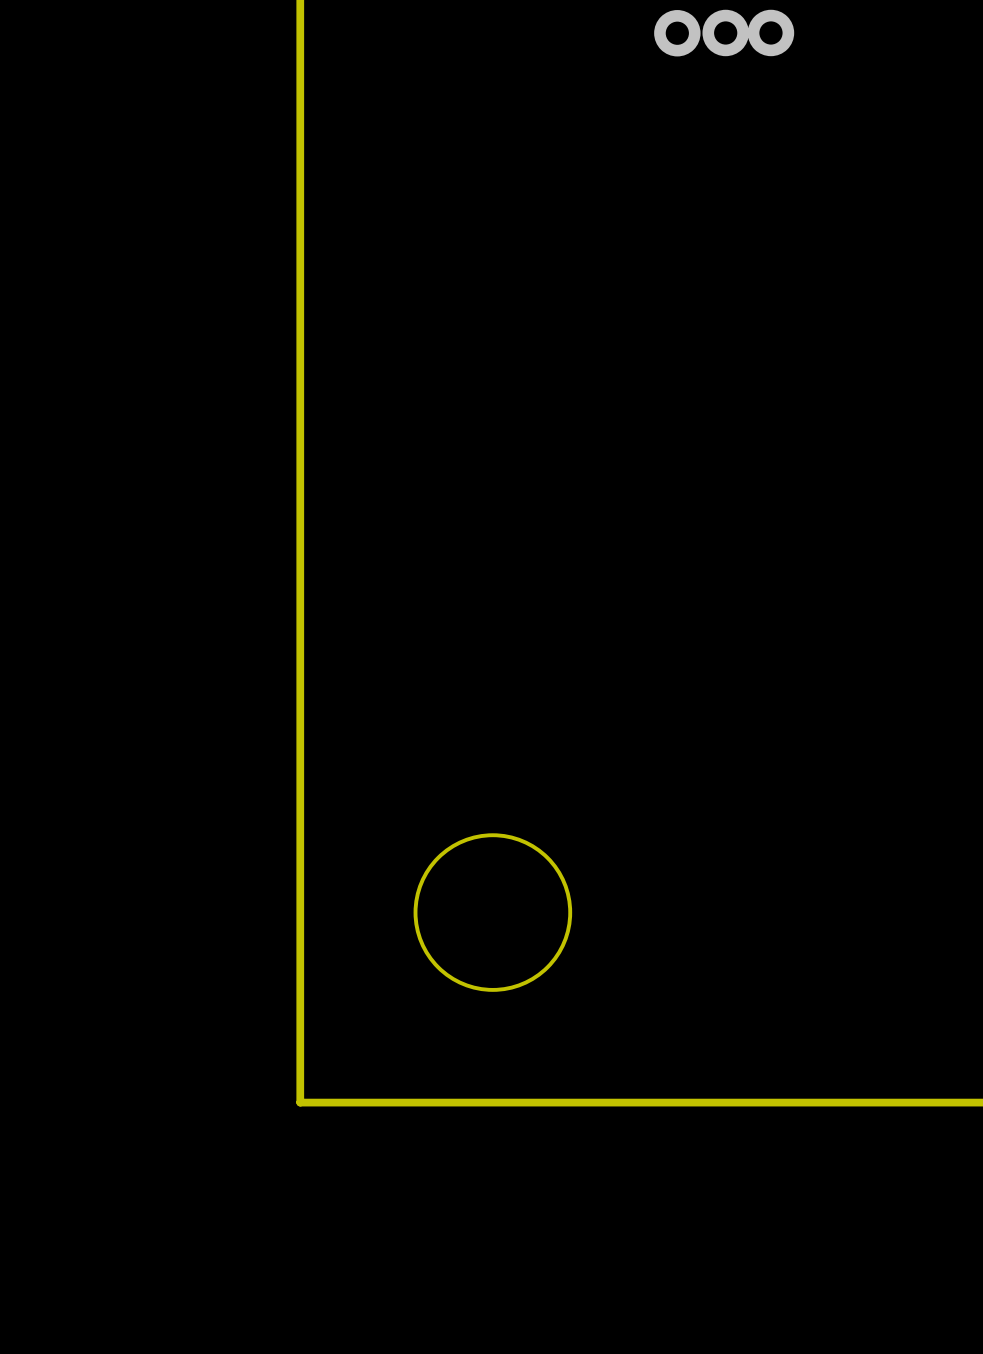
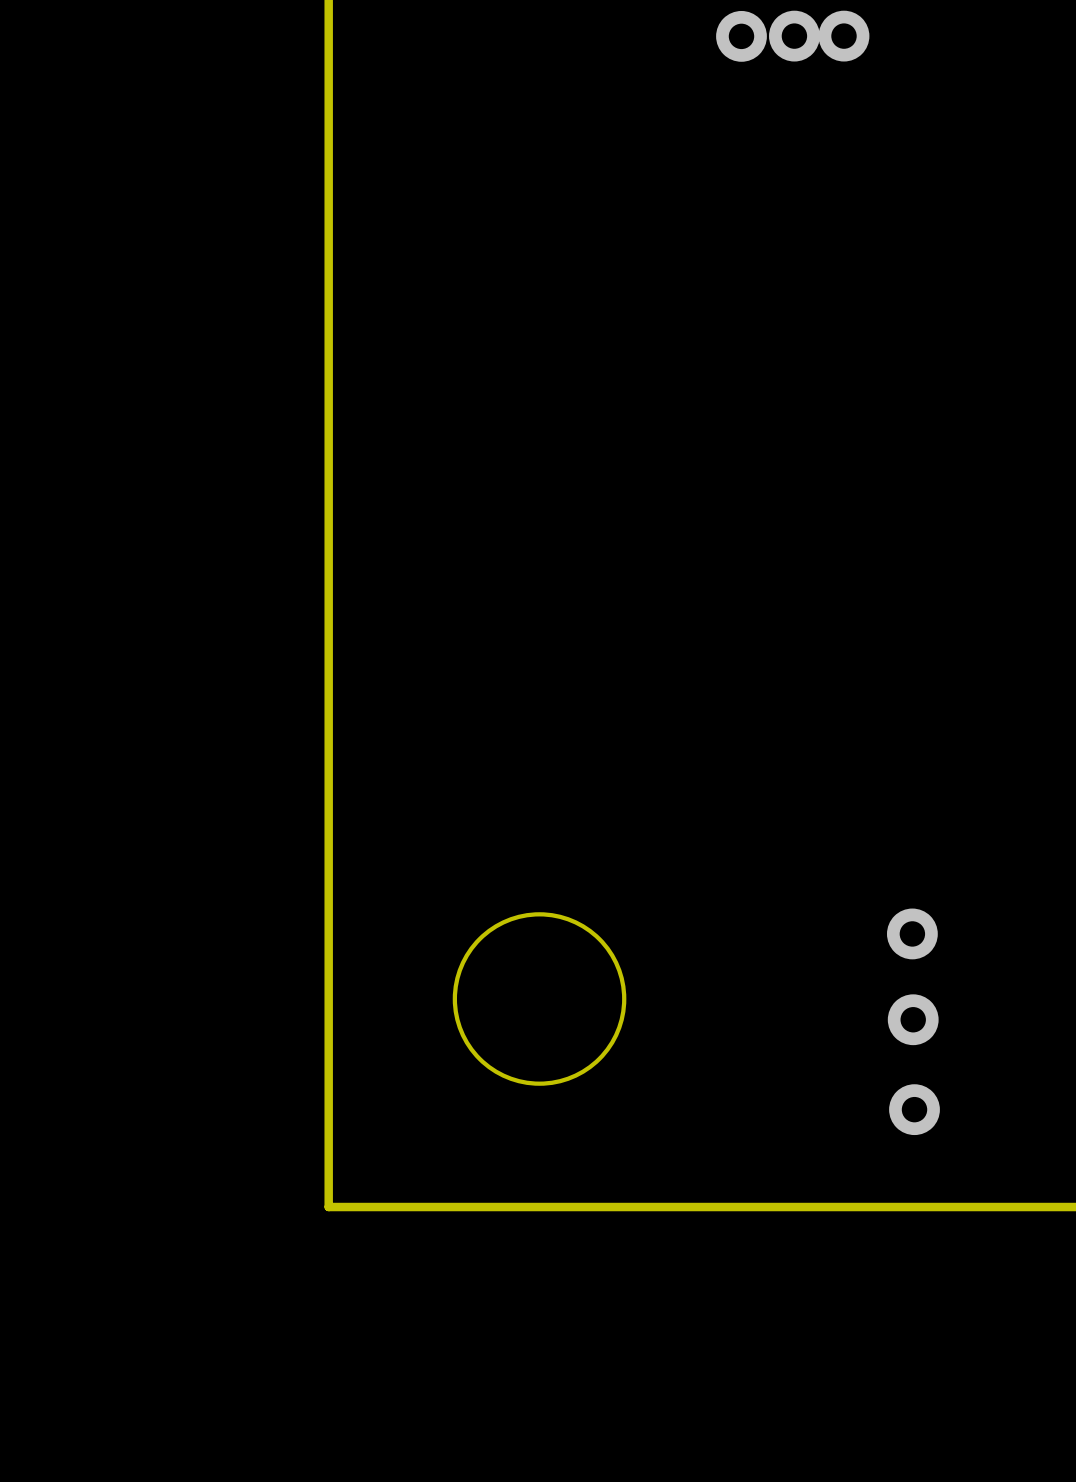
via: none -> (912, 933)
via: none -> (913, 1019)
via: none -> (914, 1109)

